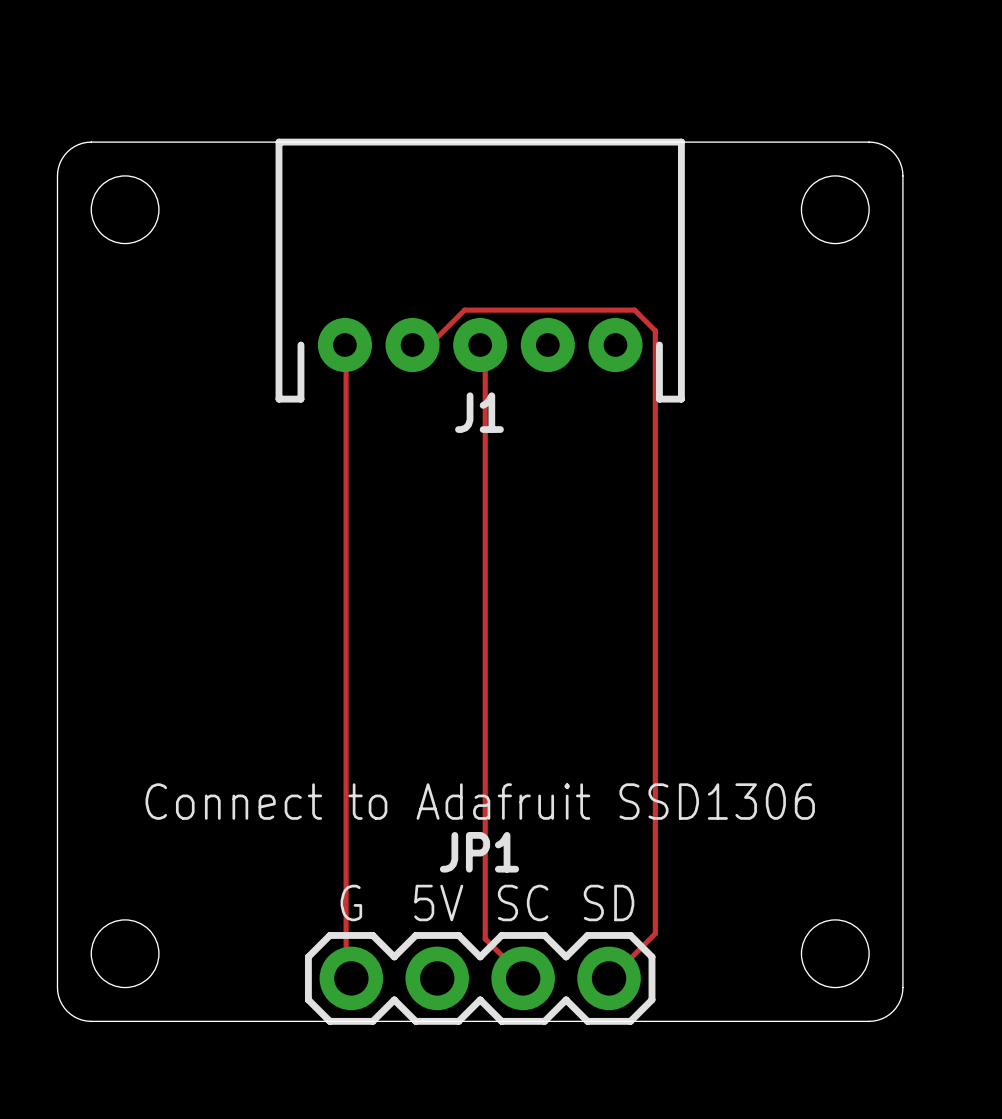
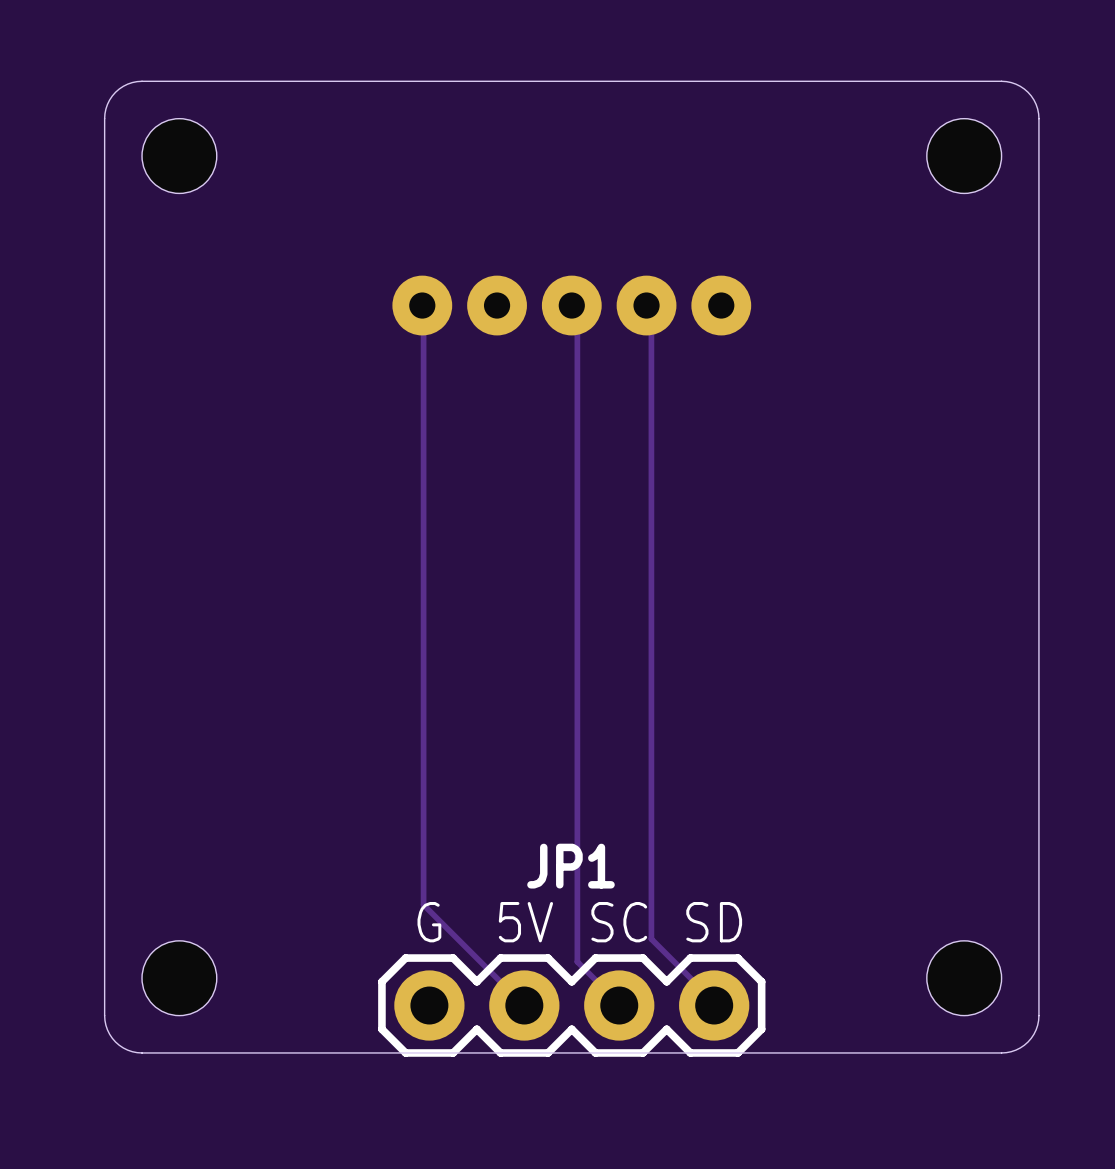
J1 side: top (480, 270) -> bottom (571, 305)
track: (412, 345) (413, 341) (433, 341) (464, 310) (634, 310) (655, 330) (655, 933) (609, 978) -> (646, 305) (651, 306) (651, 939) (714, 1001) (714, 1005)
text: Connect to Adafruit SSD1306 (480, 801) -> none
track: (346, 887) (346, 969) (351, 974) (351, 978) -> (423, 904) (524, 1005)

